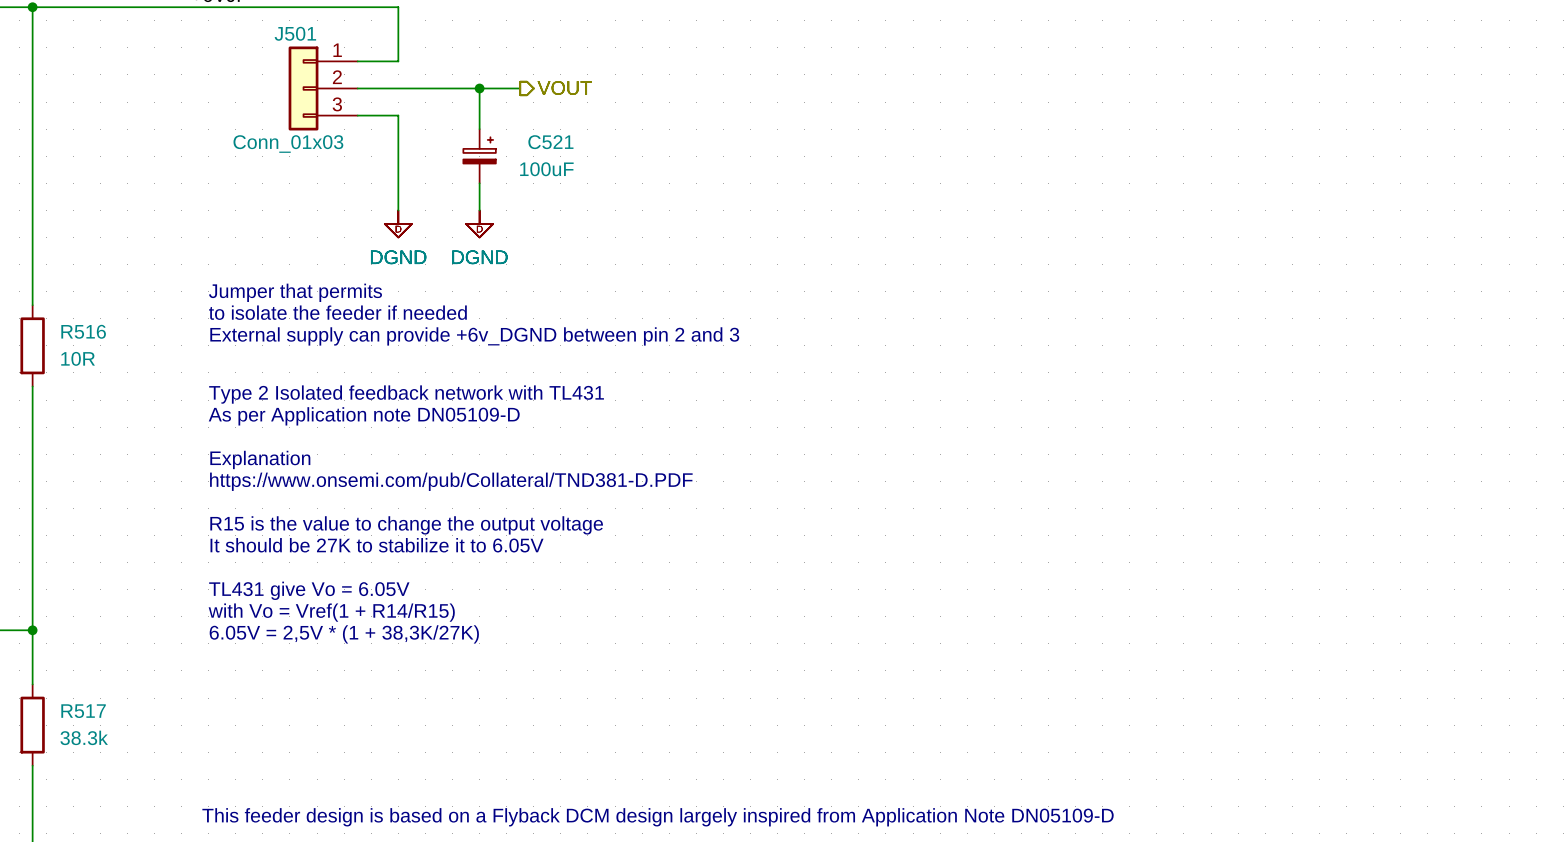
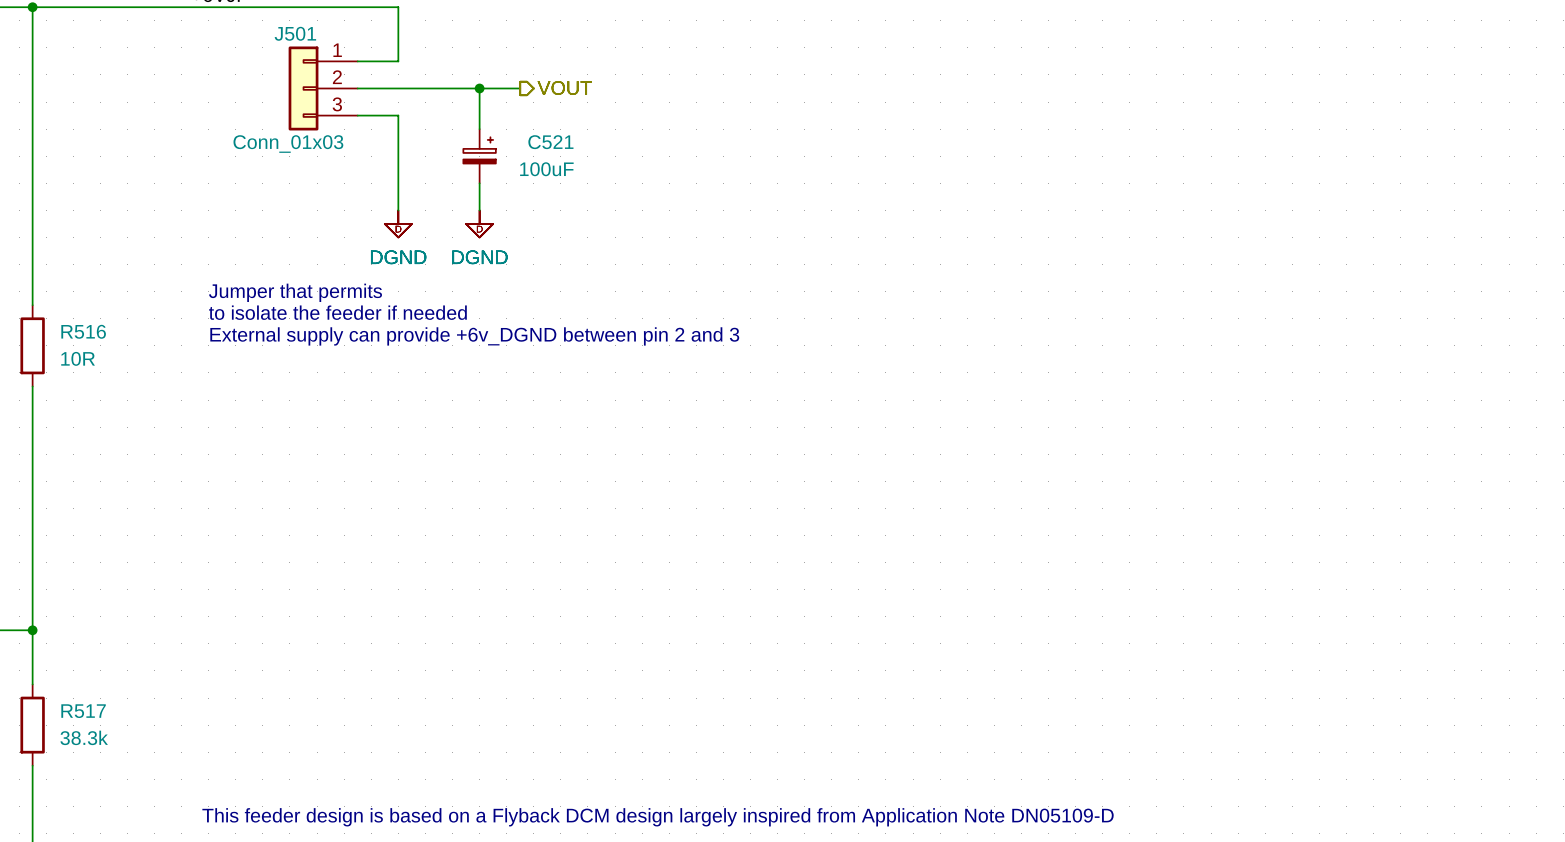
text: Type 2 Isolated feedback network with TL431 (406, 394) -> none
text: As per Application note DN05109-D (364, 416) -> none
text: Explanation (260, 459) -> none
text: https://www.onsemi.com/pub/Collateral/TND381-D.PDF (451, 481) -> none
text: R15 is the value to change the output voltage (406, 525) -> none
text: It should be 27K to stabilize it to 6.05V (377, 545) -> none
text: TL431 give Vo = 6.05V (309, 590) -> none
text: with Vo = Vref(1 + R14/R15) (331, 612) -> none
text: 6.05V = 2,5V * (1 + 38,3K/27K) (344, 634) -> none

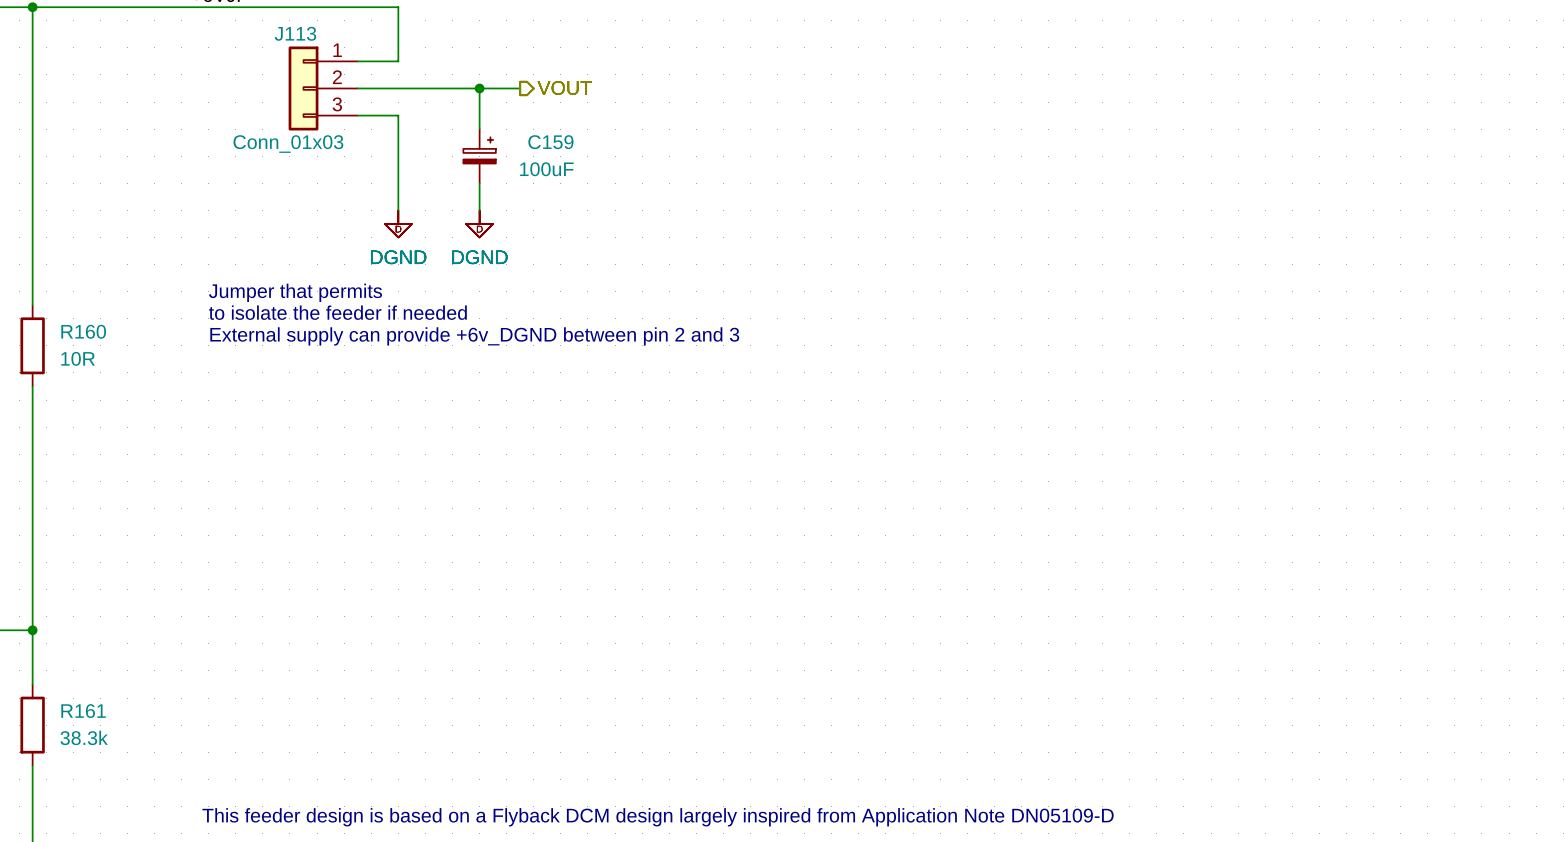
J501 name: J501 (295, 33) -> J113 (295, 33)
C521 name: C521 (550, 142) -> C159 (550, 142)
R516 name: R516 (83, 331) -> R160 (83, 331)
R517 name: R517 (83, 711) -> R161 (83, 711)

